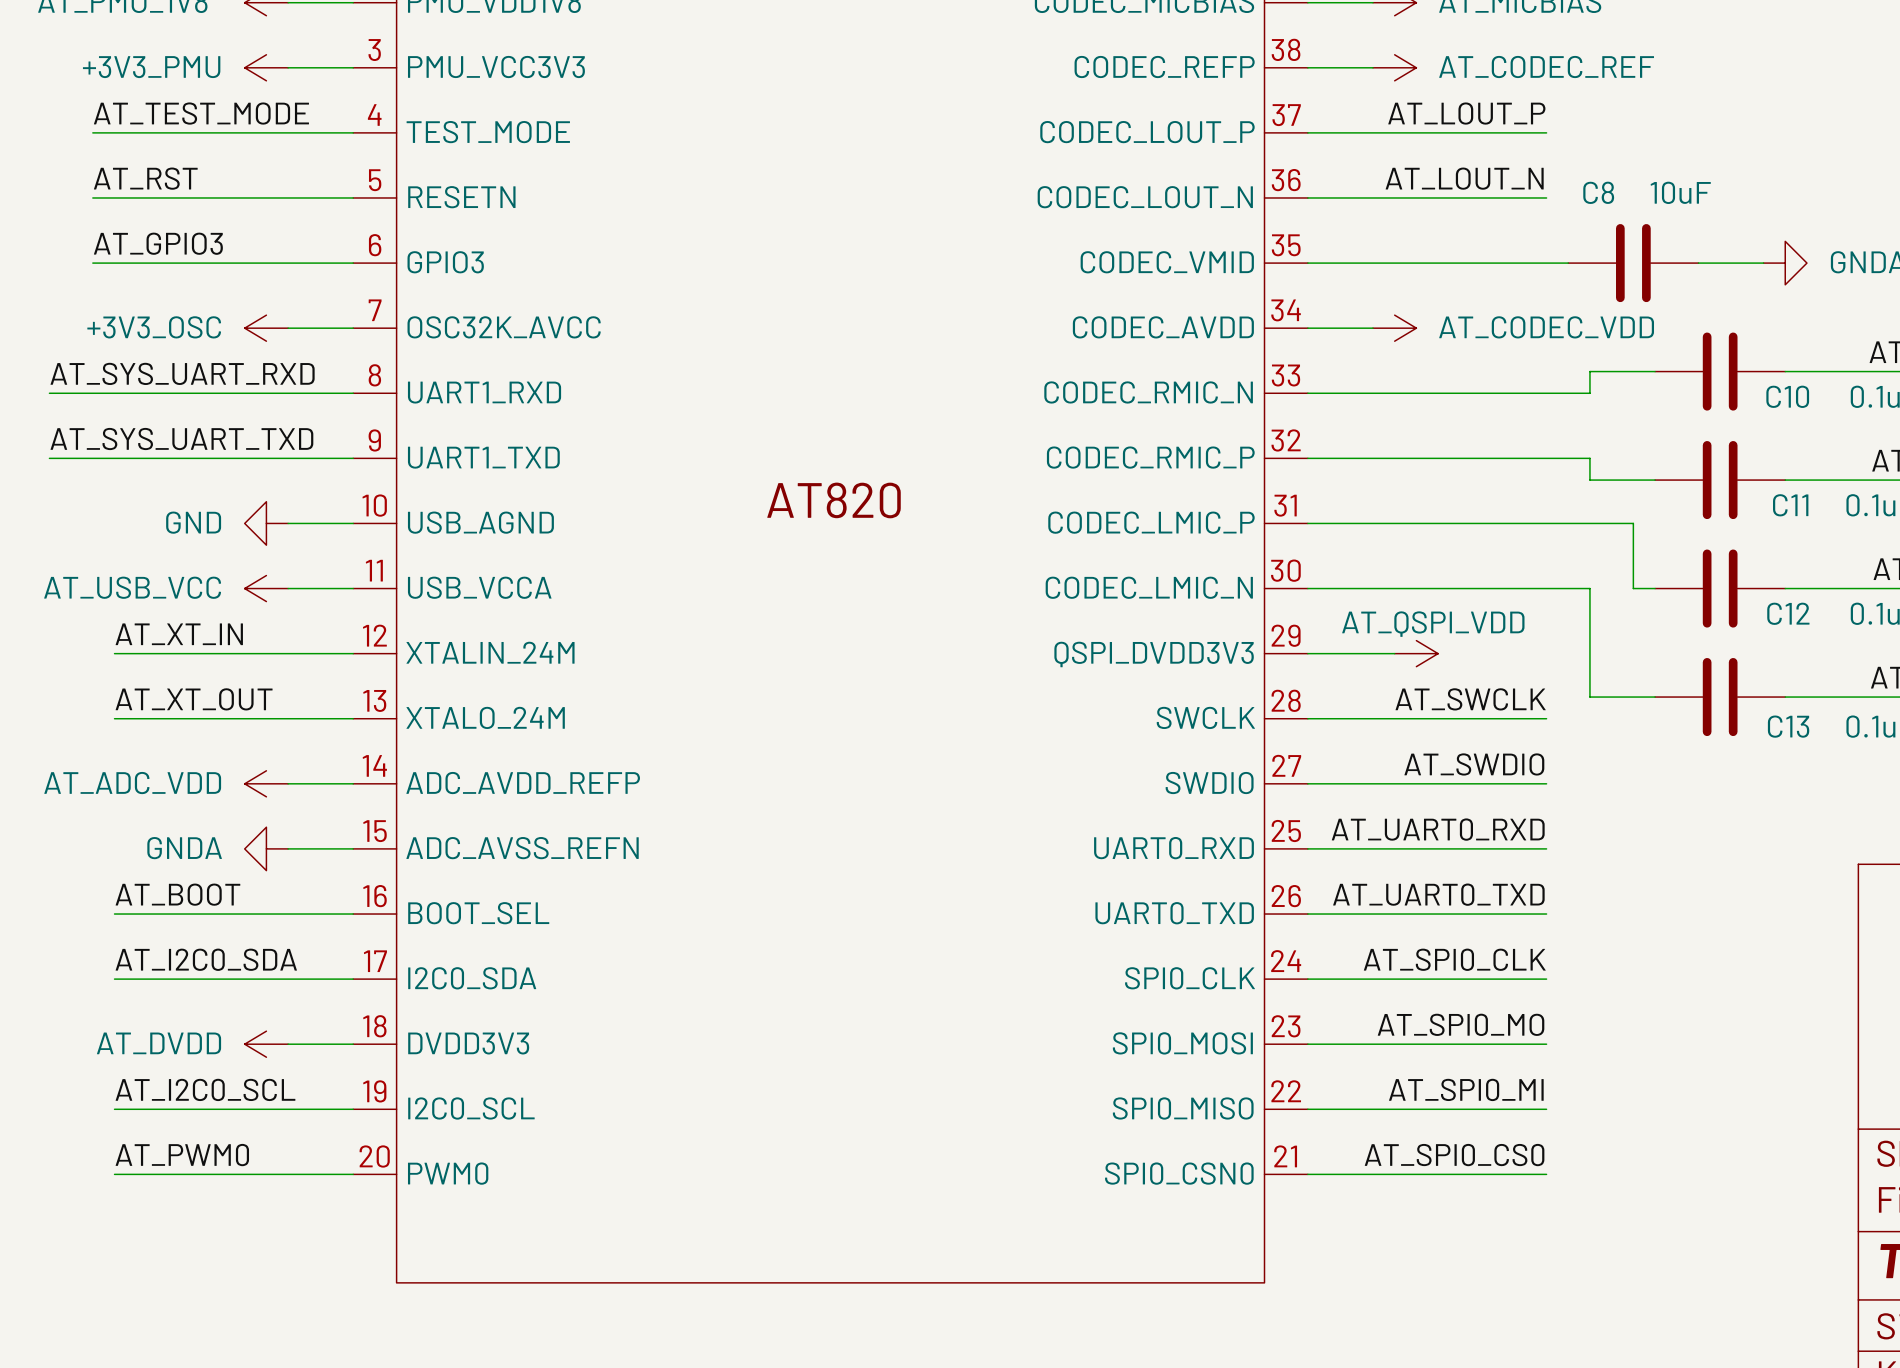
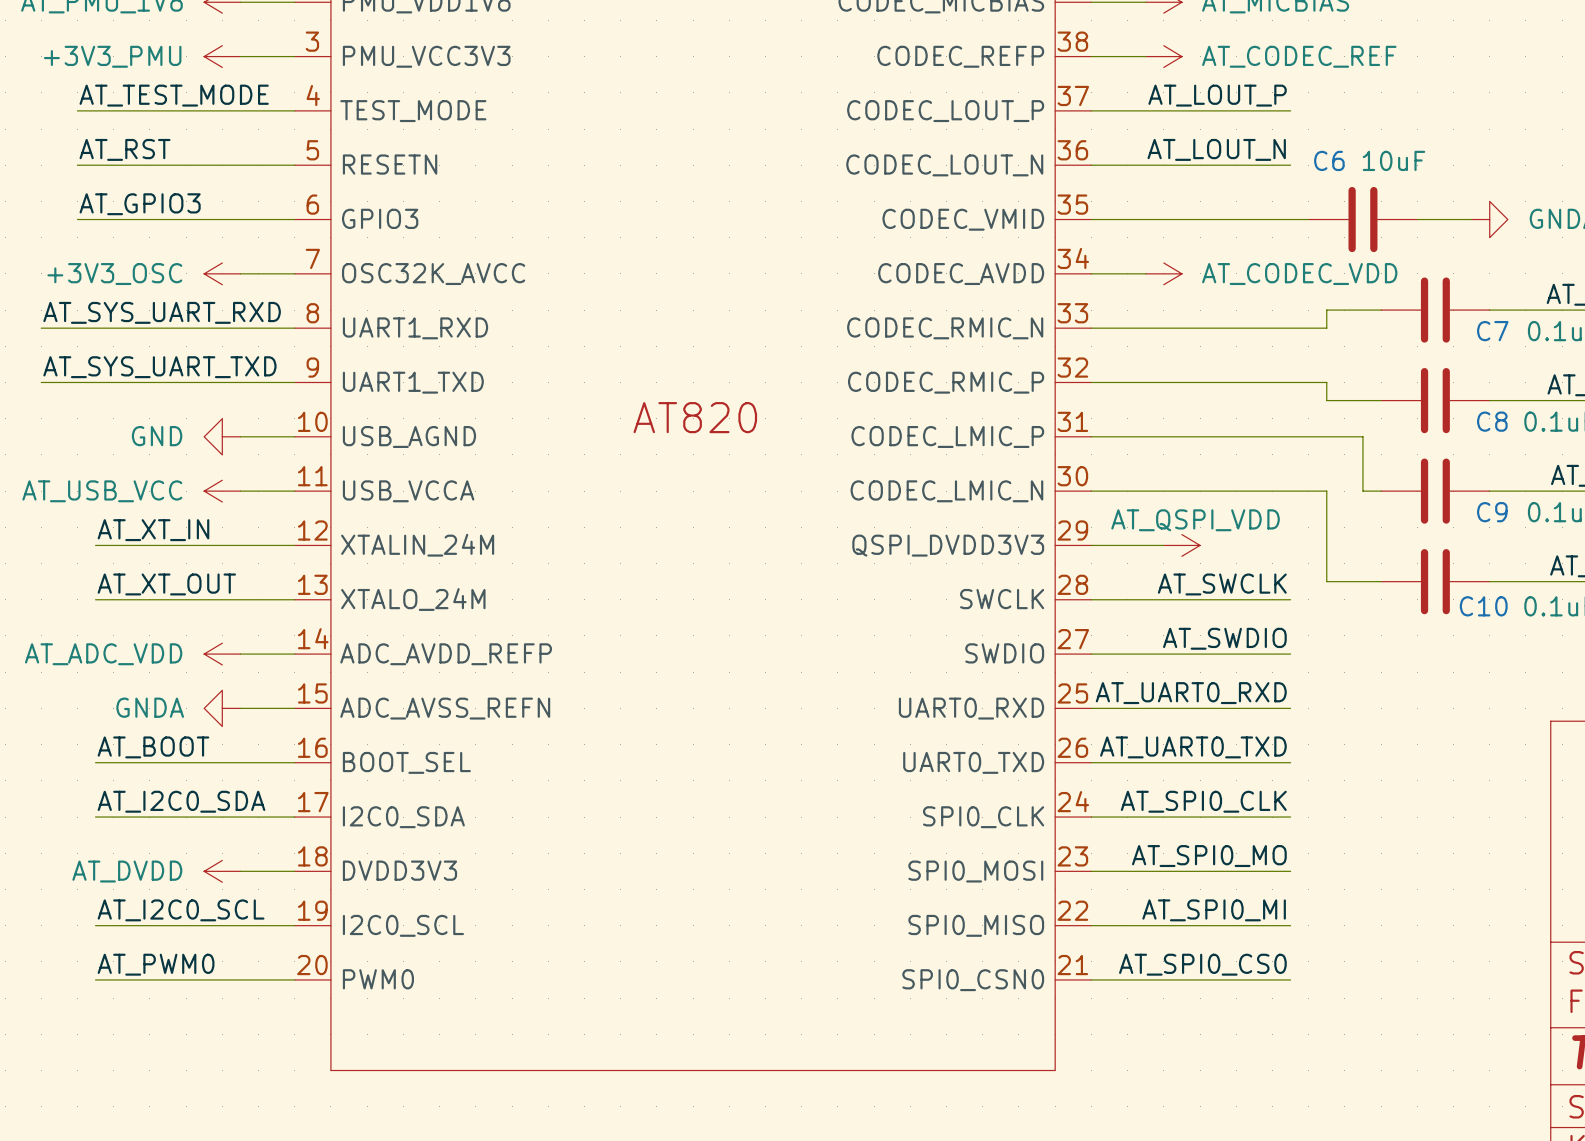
C8 name: C8 (1598, 192) -> C6 (1329, 160)
C10 name: C10 (1787, 396) -> C7 (1492, 331)
C11 name: C11 (1790, 505) -> C8 (1492, 421)
C12 name: C12 (1788, 613) -> C9 (1492, 512)
C13 name: C13 (1788, 726) -> C10 (1483, 606)

